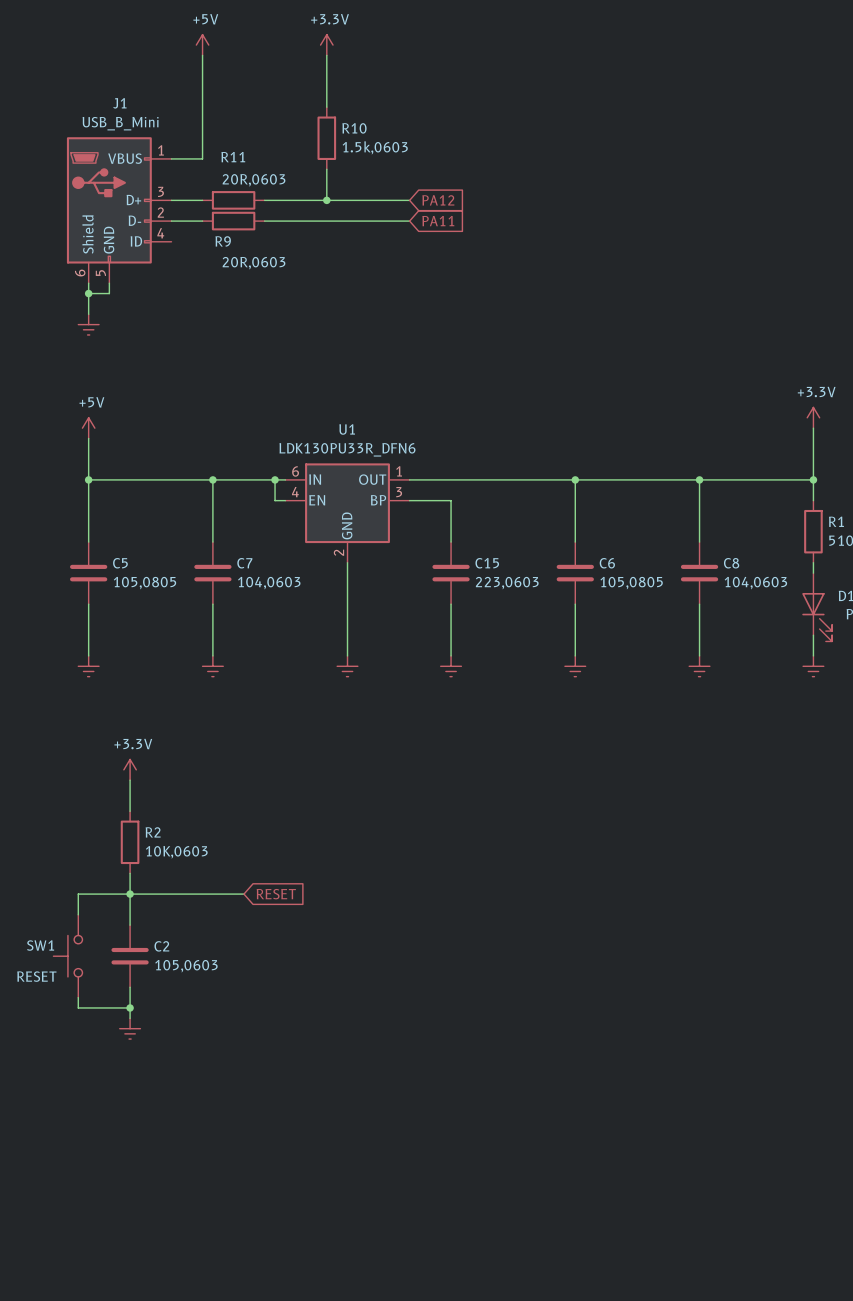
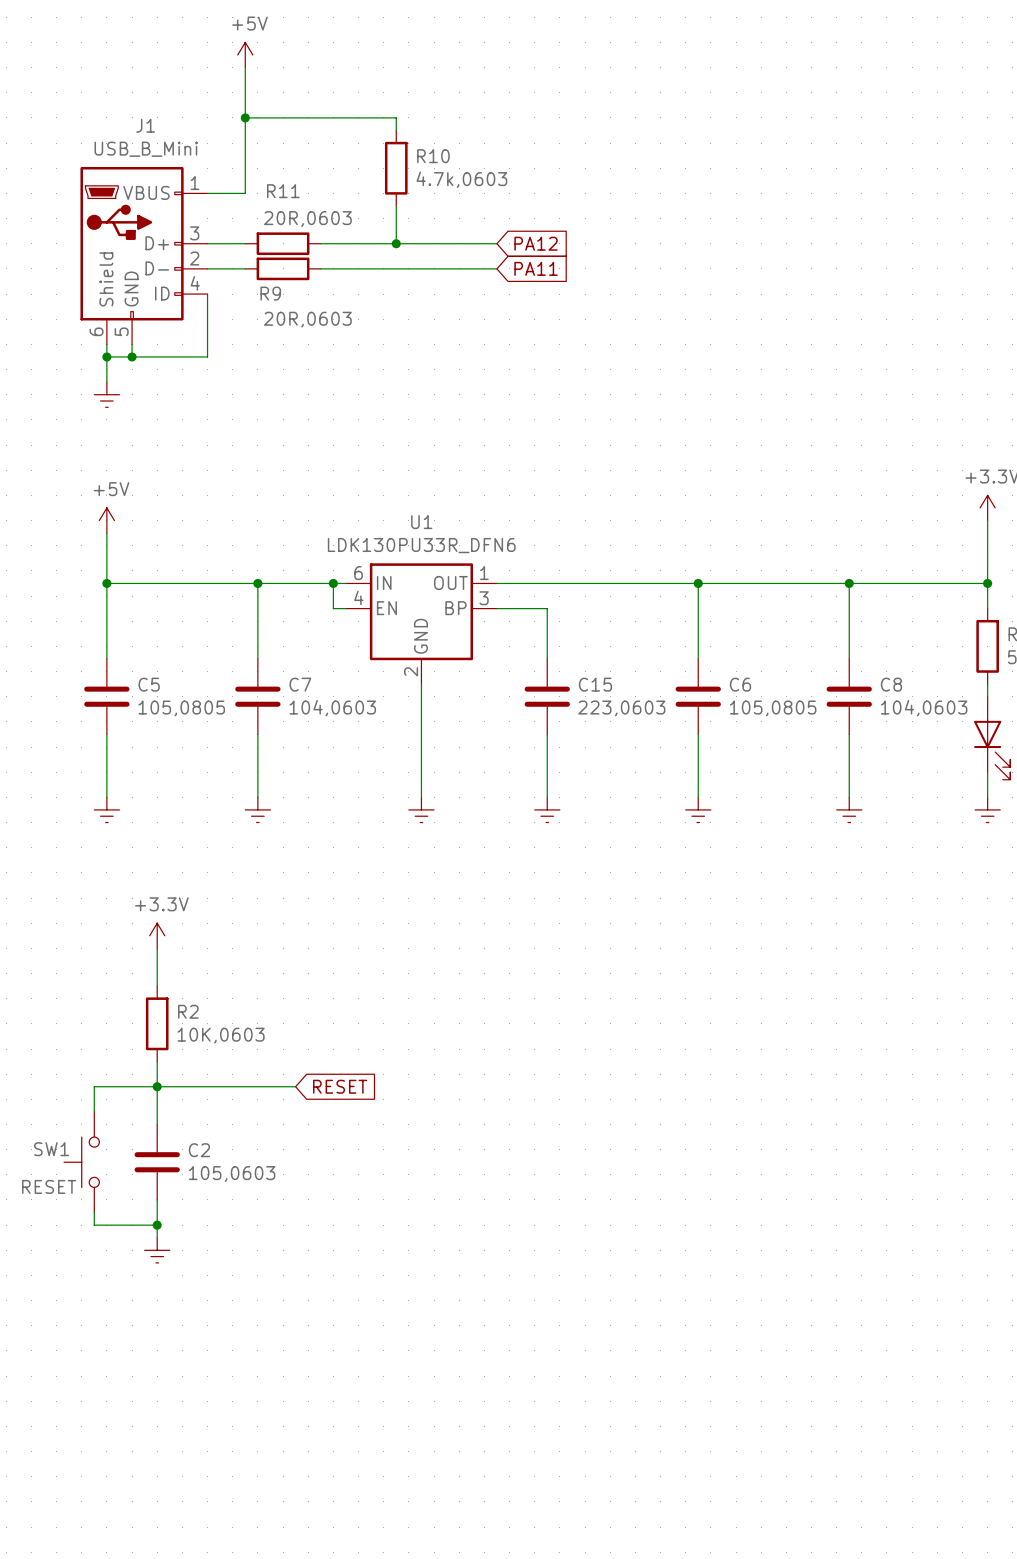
power symbol: +3.3V (326, 45) -> none
wire: (326, 55) (326, 96) -> (245, 117) (396, 117)
junction: none -> (245, 117)
R10 value: 1.5k,0603 (375, 147) -> 4.7k,0603 (461, 179)
wire: none -> (207, 294) (207, 356) (132, 356)
junction: none -> (132, 356)

